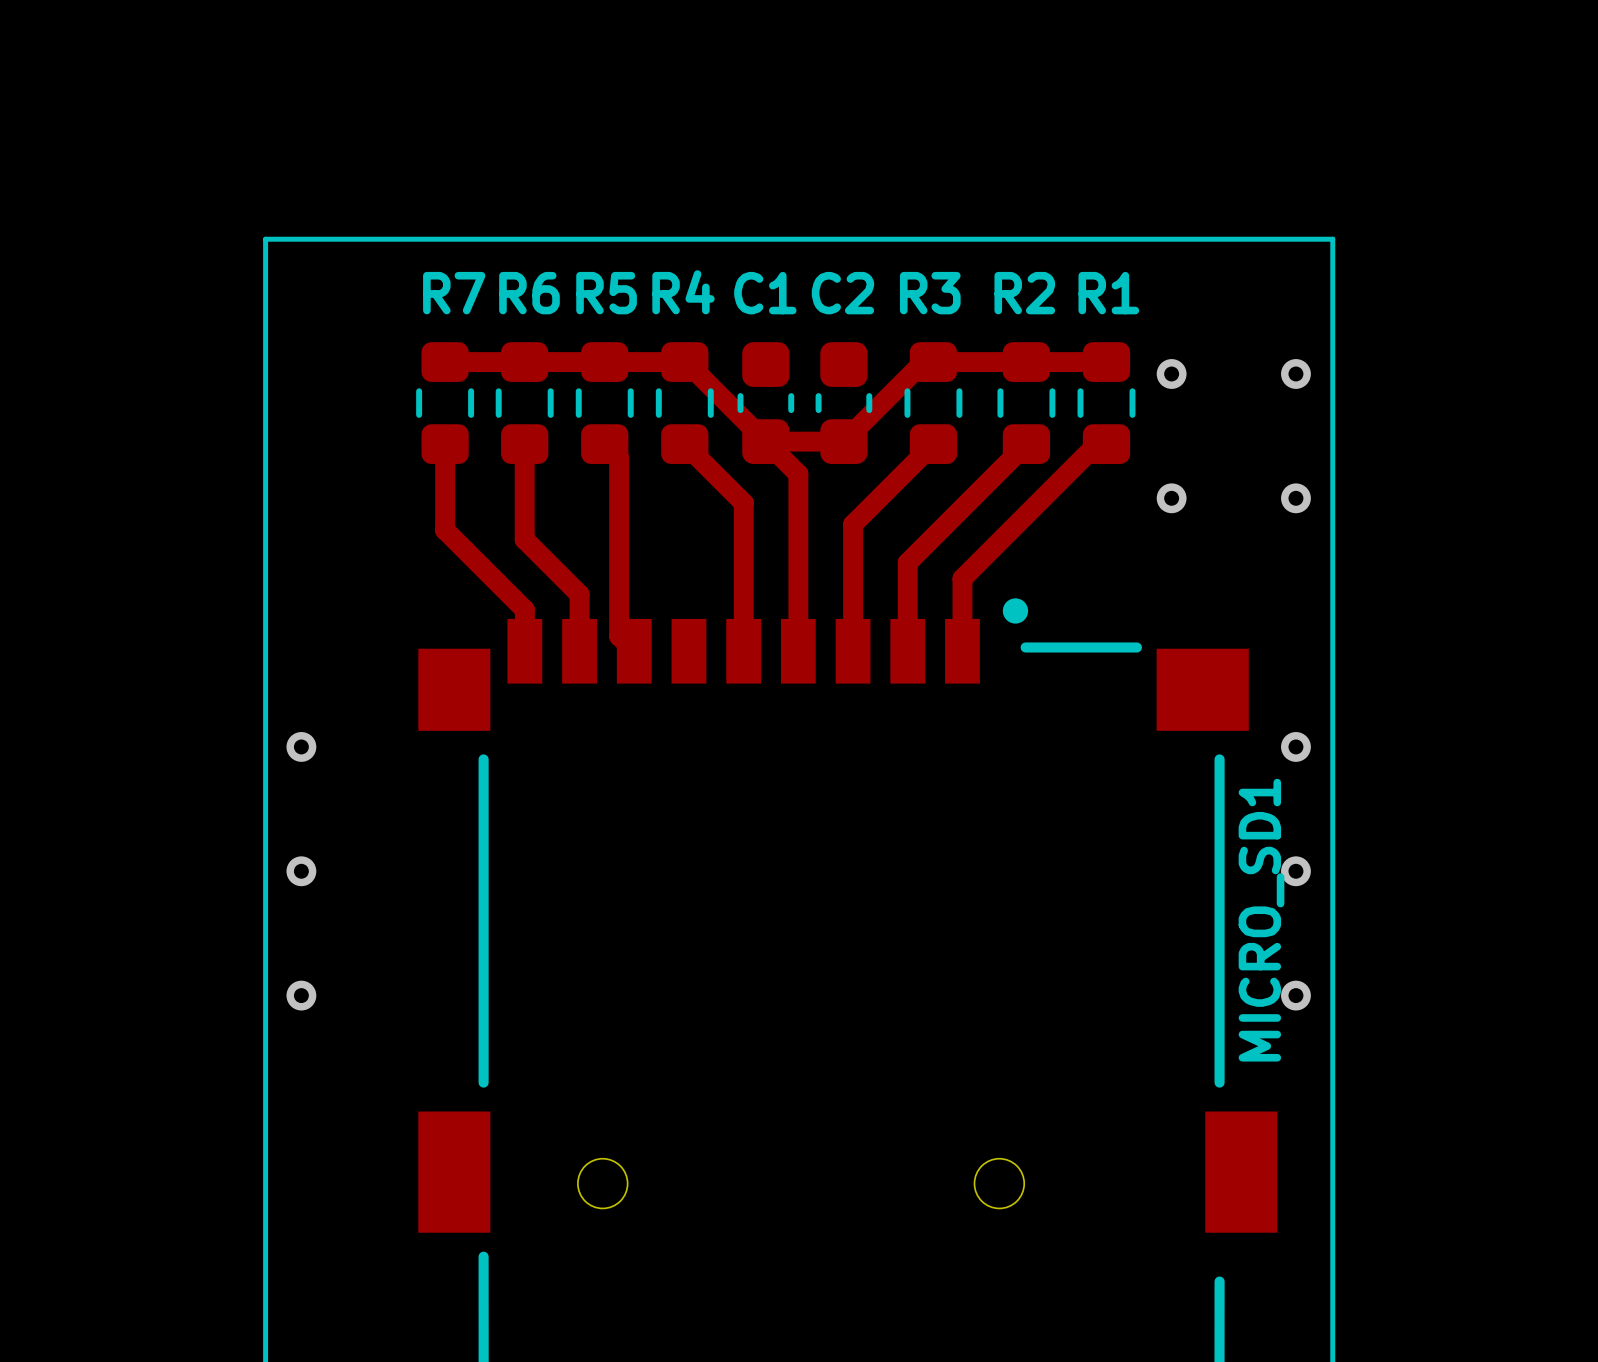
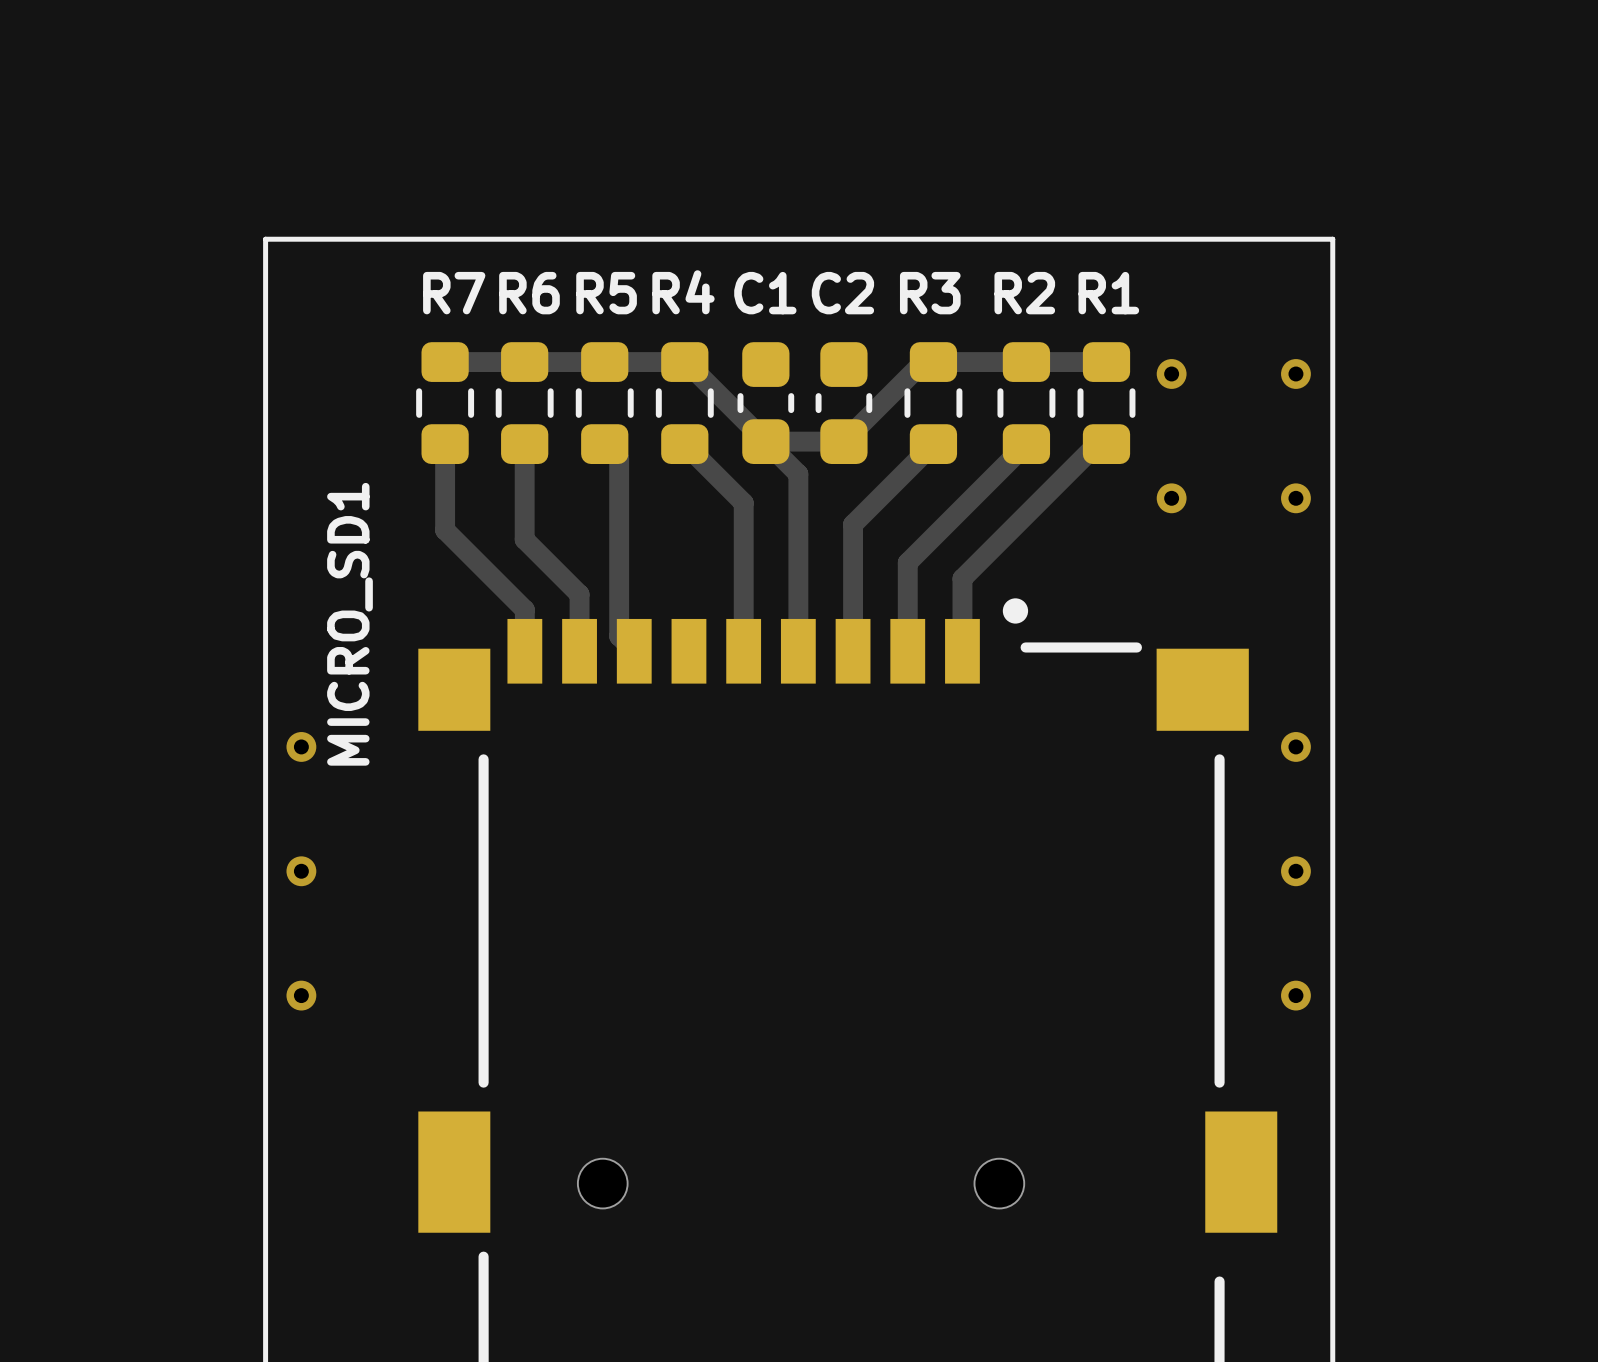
MICRO_SD1 name position: MICRO_SD1 (1261, 920) -> MICRO_SD1 (349, 624)

